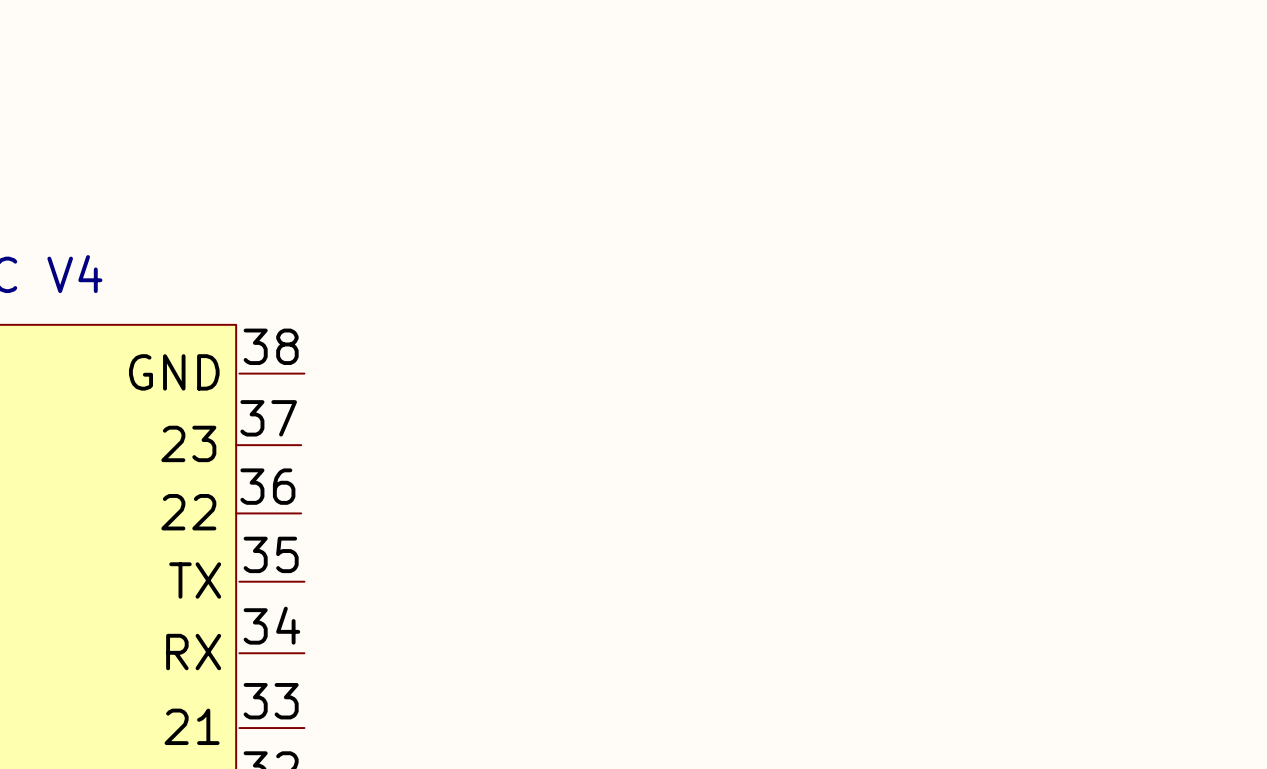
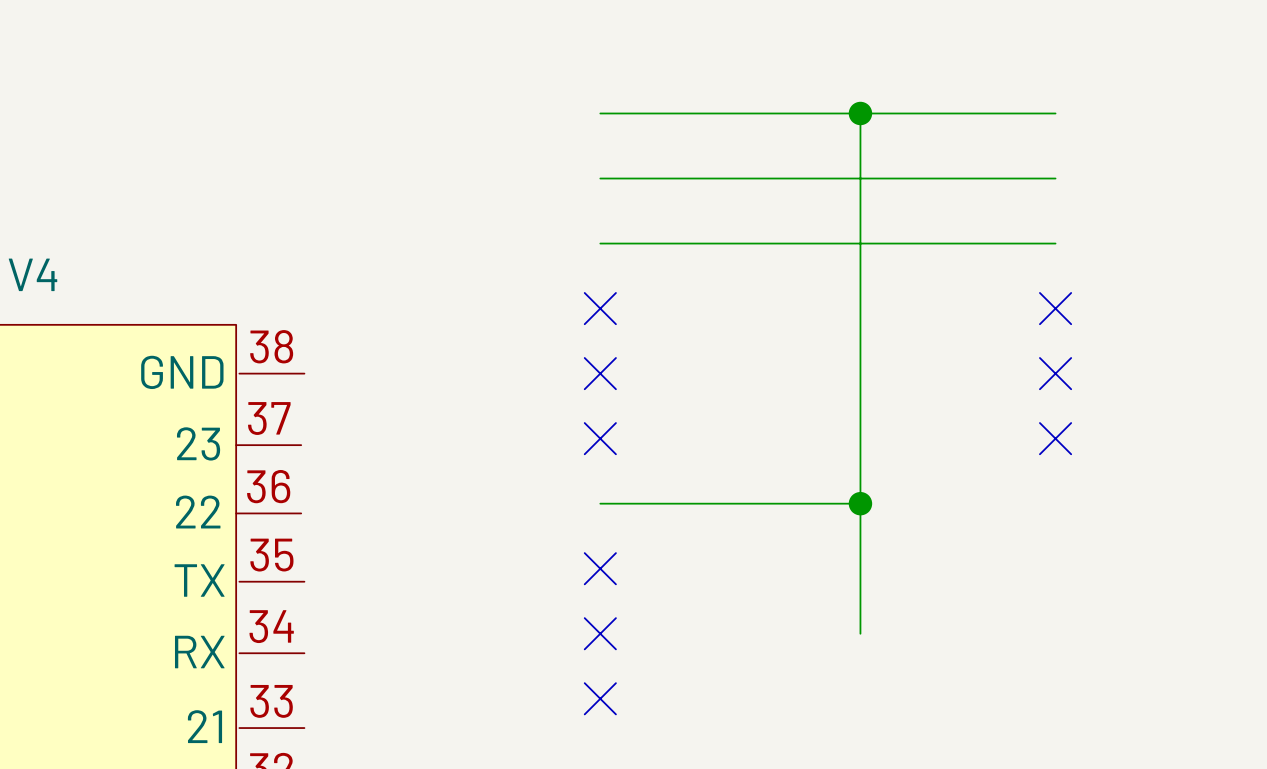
wire: none -> (600, 113) (1055, 113)
wire: none -> (860, 113) (860, 633)
junction: none -> (860, 113)
wire: none -> (600, 178) (1055, 178)
wire: none -> (600, 243) (1055, 243)
no-connect mark: none -> (600, 308)
no-connect mark: none -> (1055, 308)
no-connect mark: none -> (600, 373)
no-connect mark: none -> (1055, 373)
no-connect mark: none -> (600, 438)
no-connect mark: none -> (1055, 438)
wire: none -> (600, 503) (860, 503)
junction: none -> (860, 503)
no-connect mark: none -> (600, 568)
no-connect mark: none -> (600, 633)
no-connect mark: none -> (600, 698)

